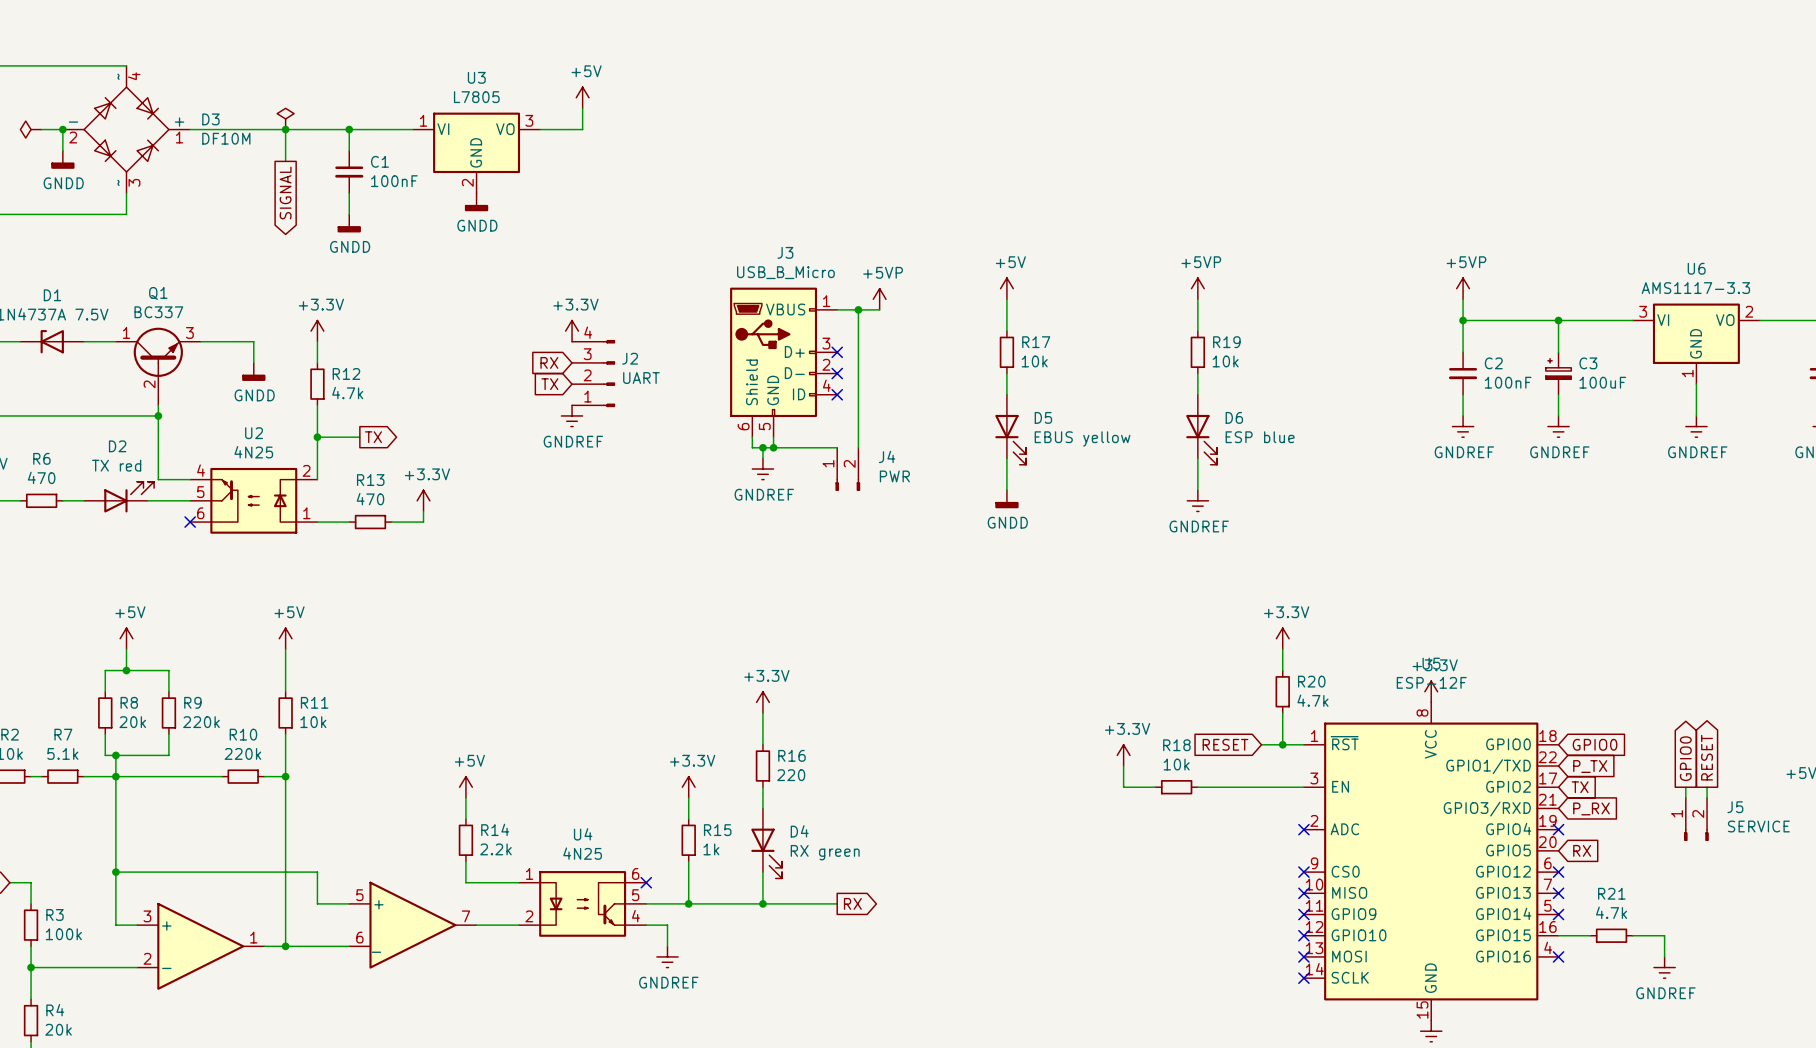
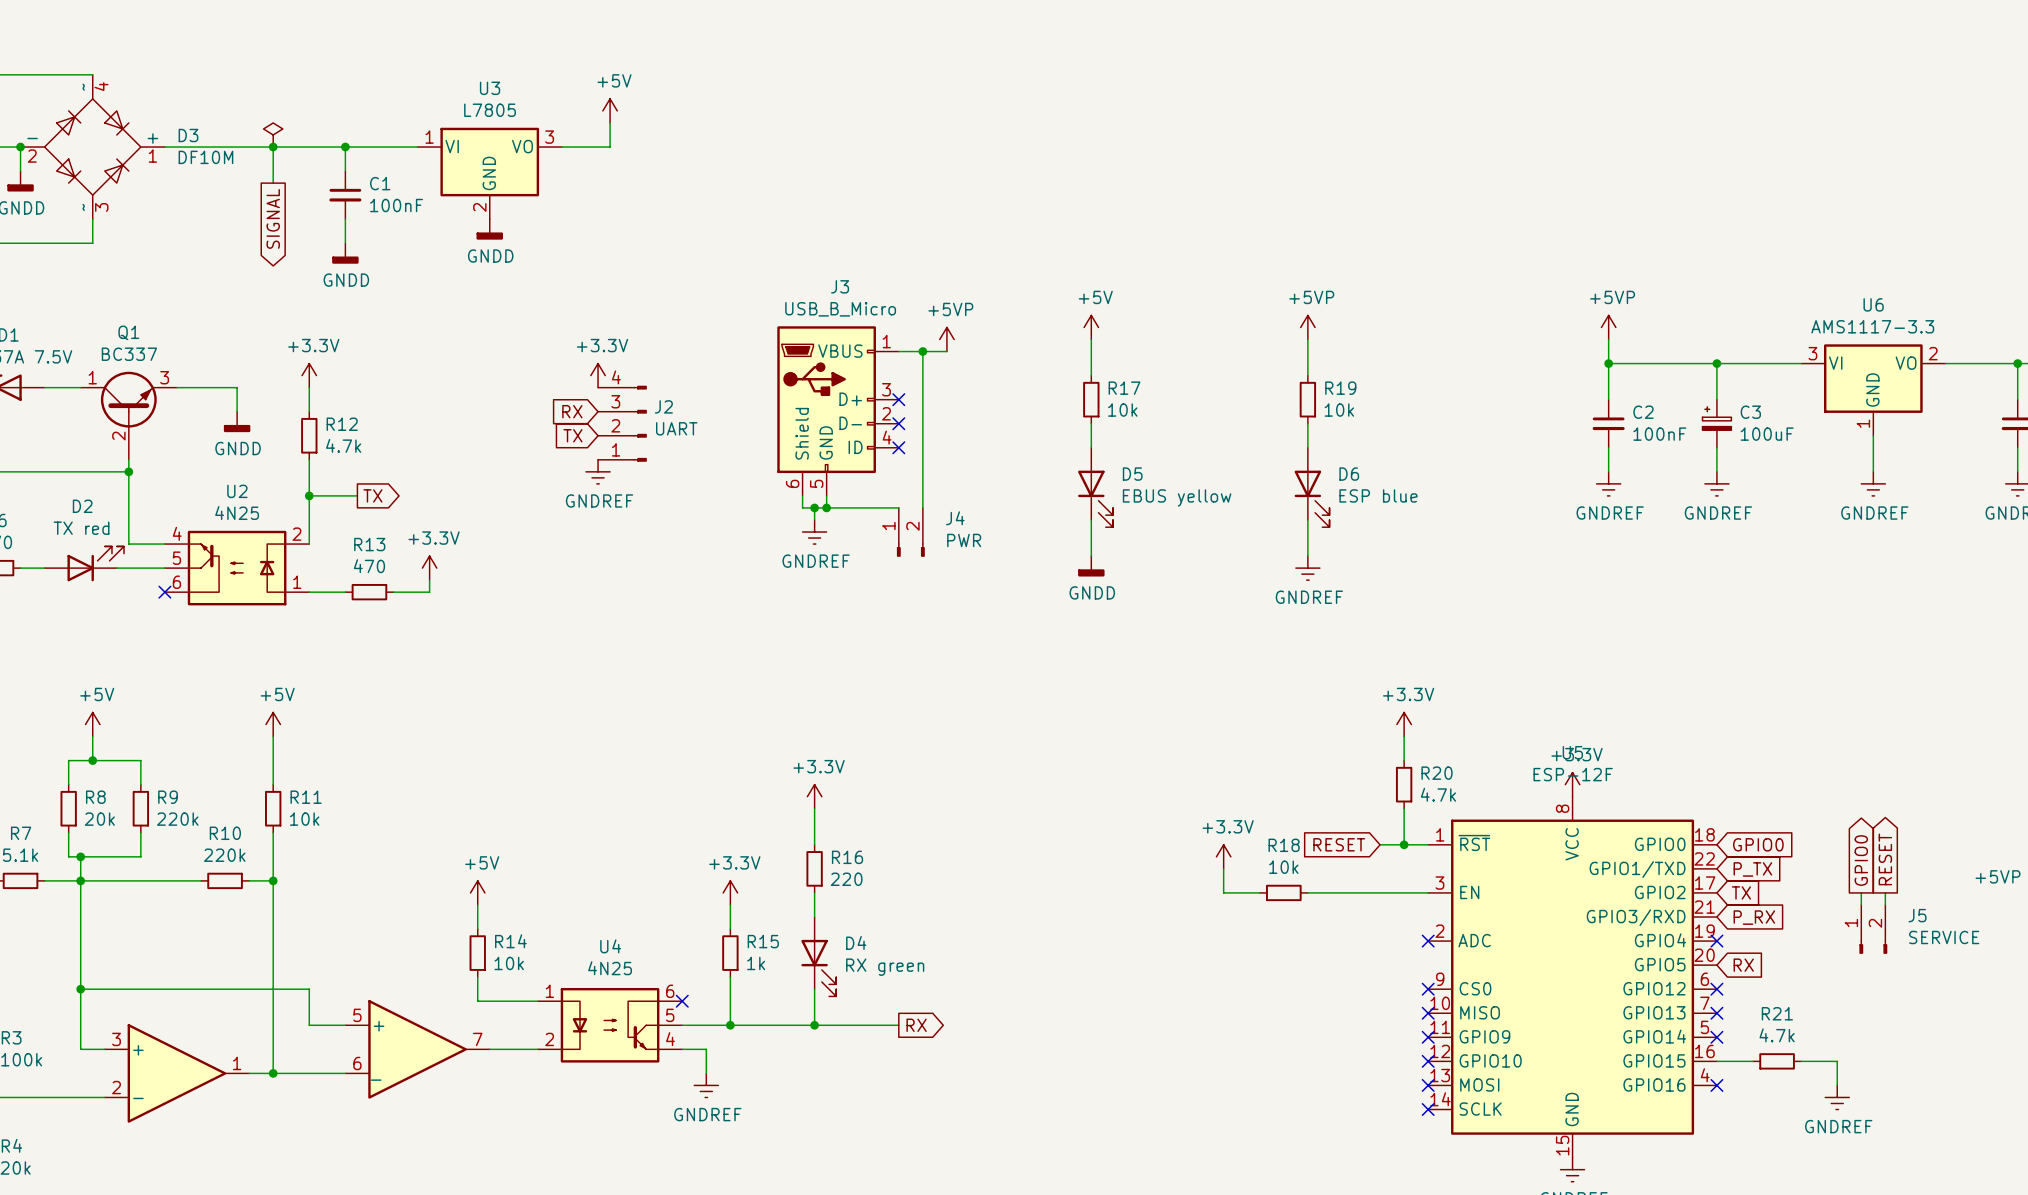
R14 value: 2.2k (495, 849) -> 10k (509, 963)

